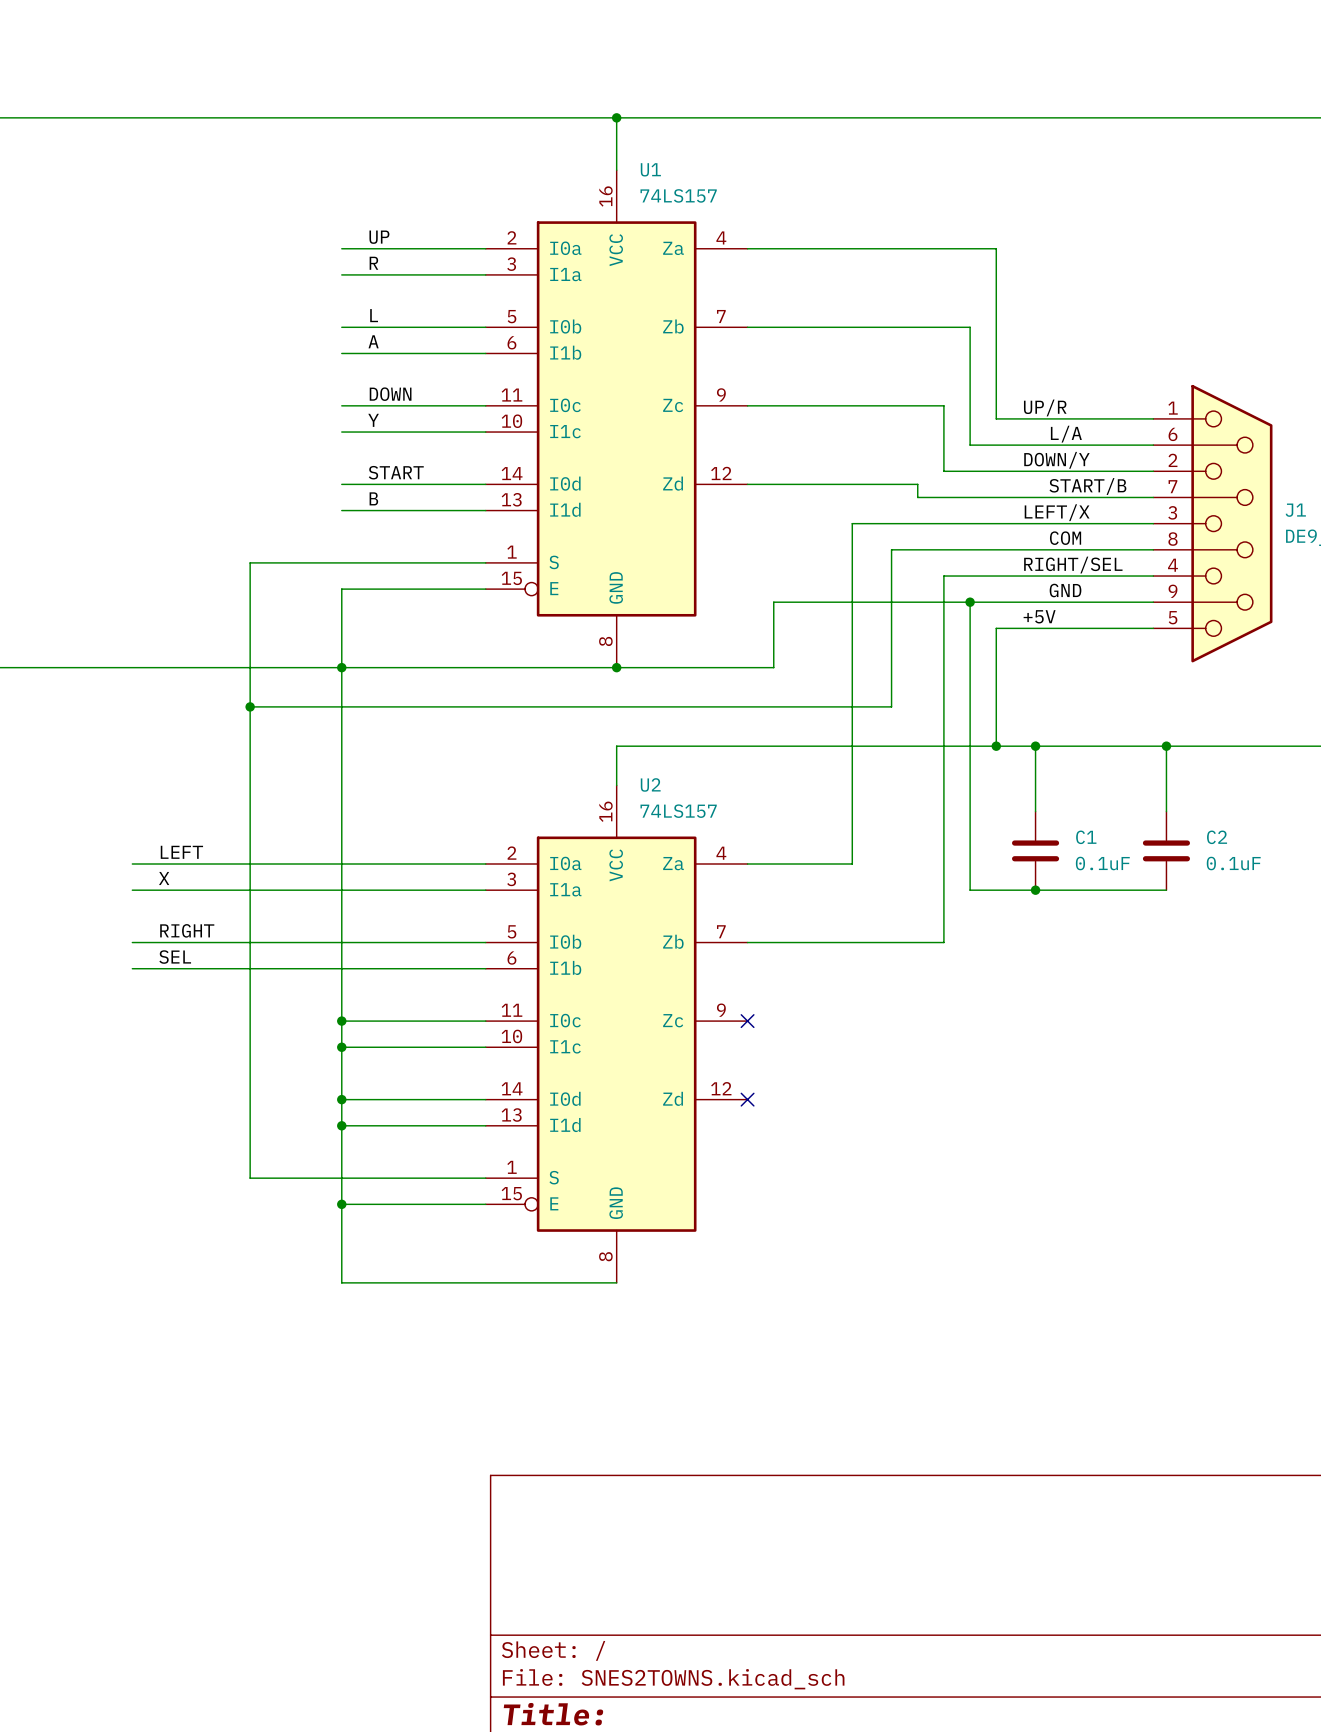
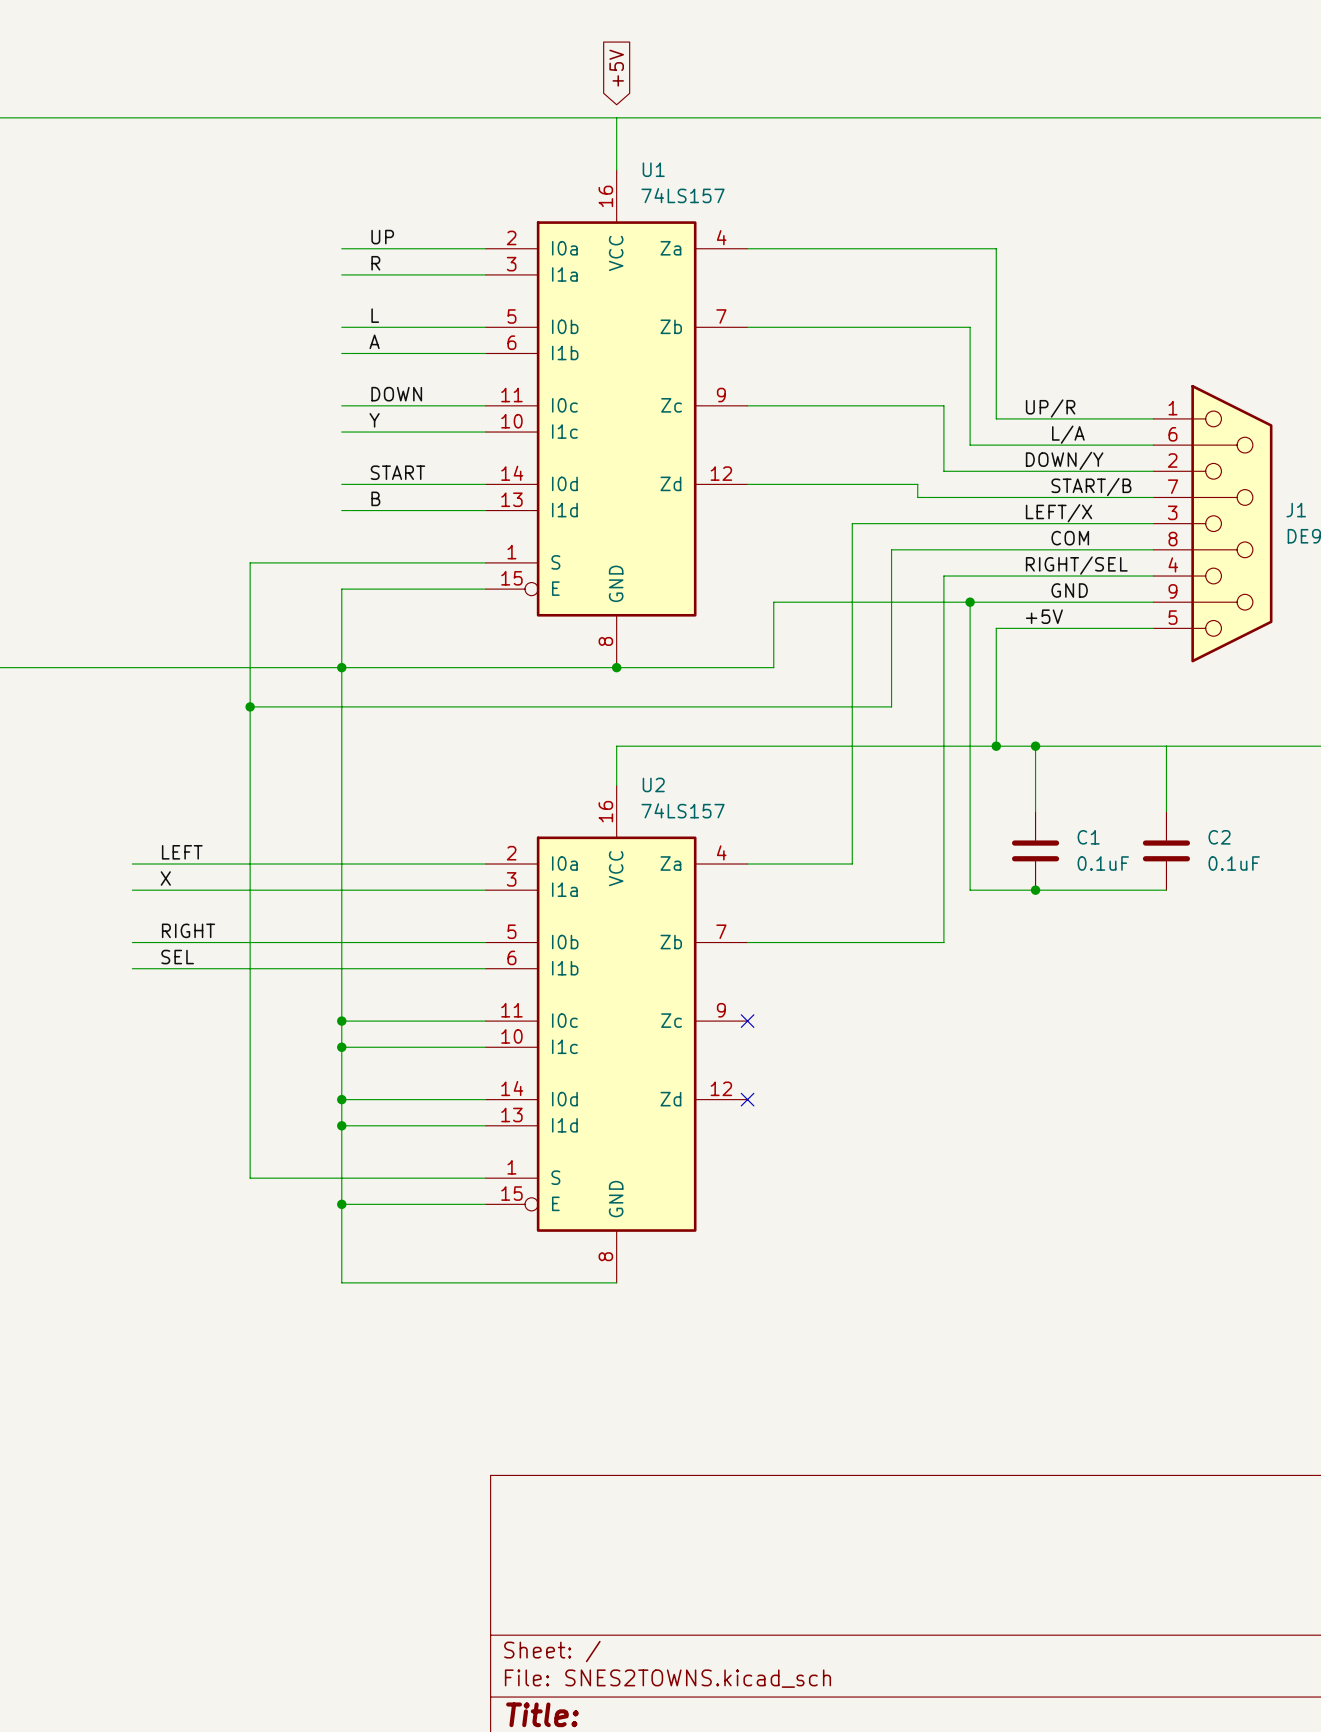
global label: none -> +5V (616, 68)
junction: (616, 117) -> none
junction: (1166, 746) -> none

